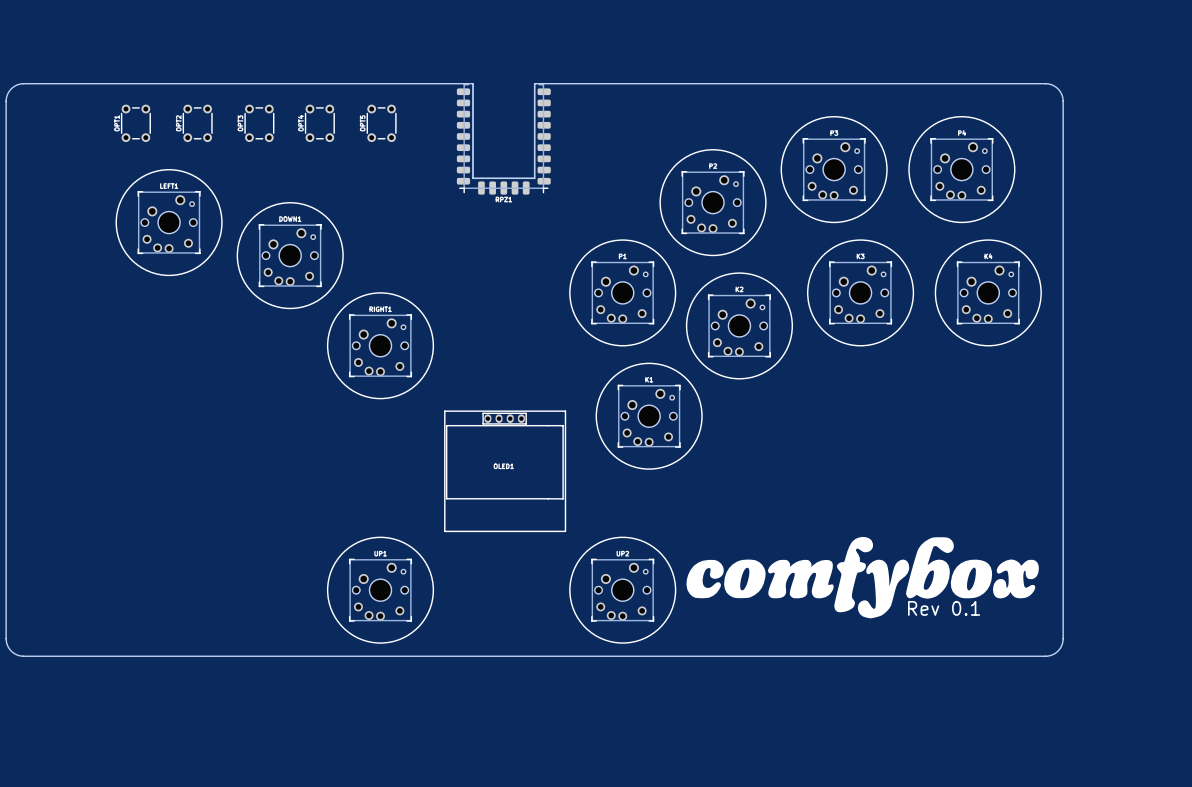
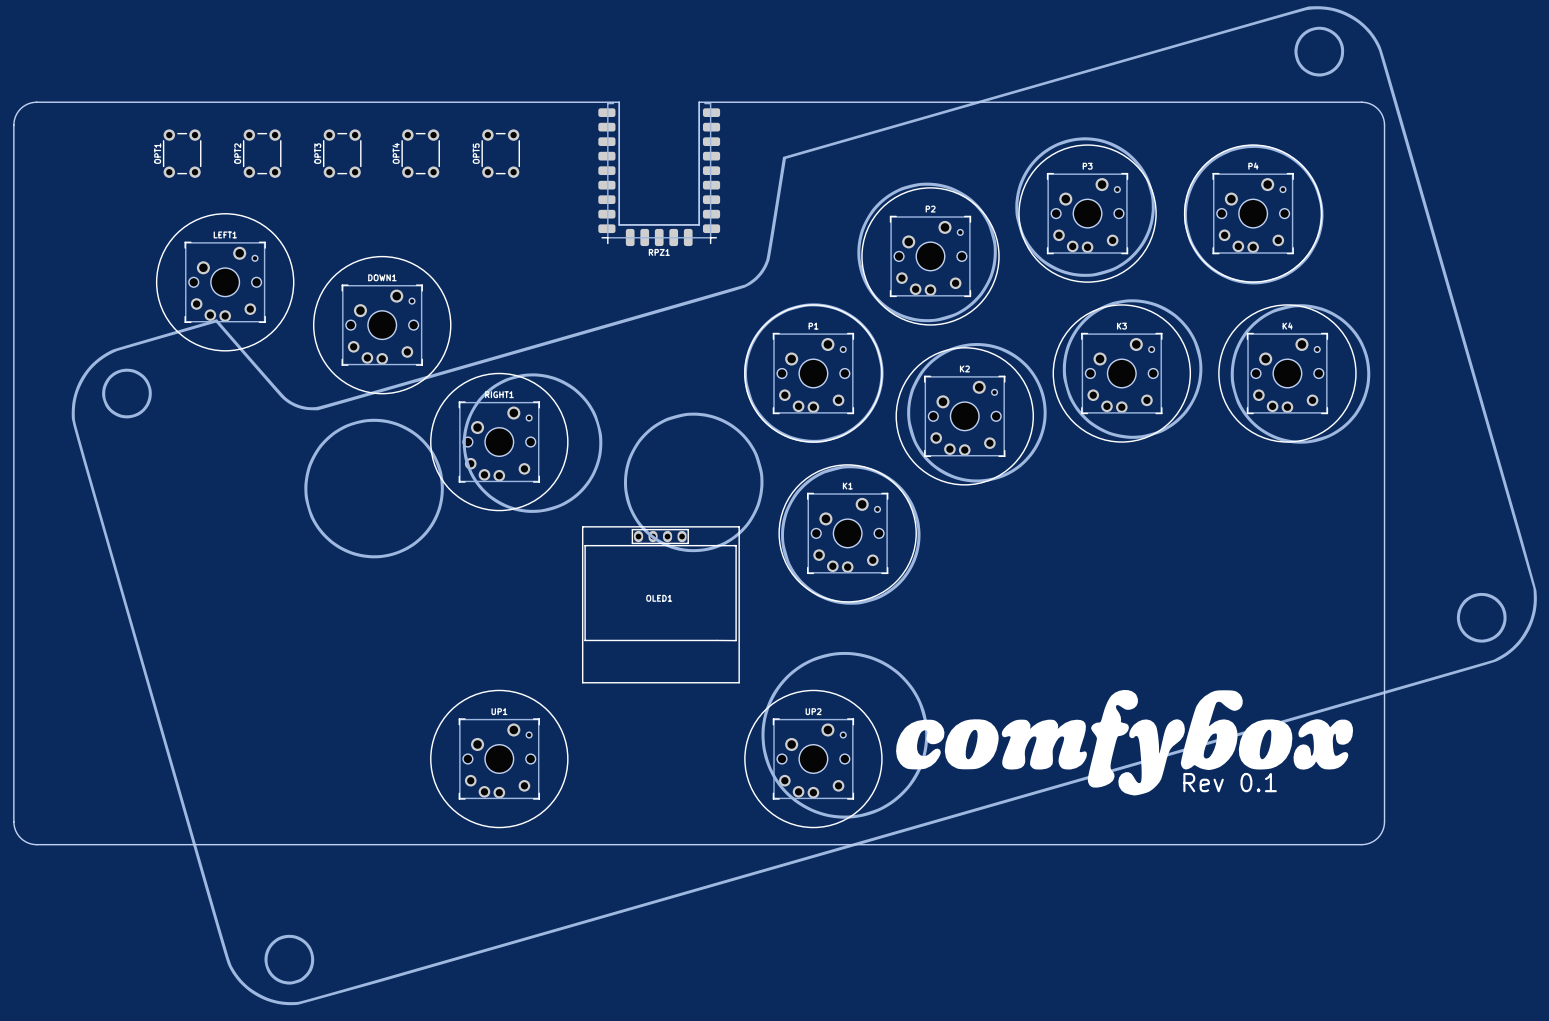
drawing: none -> [71, 6, 1537, 1006]

